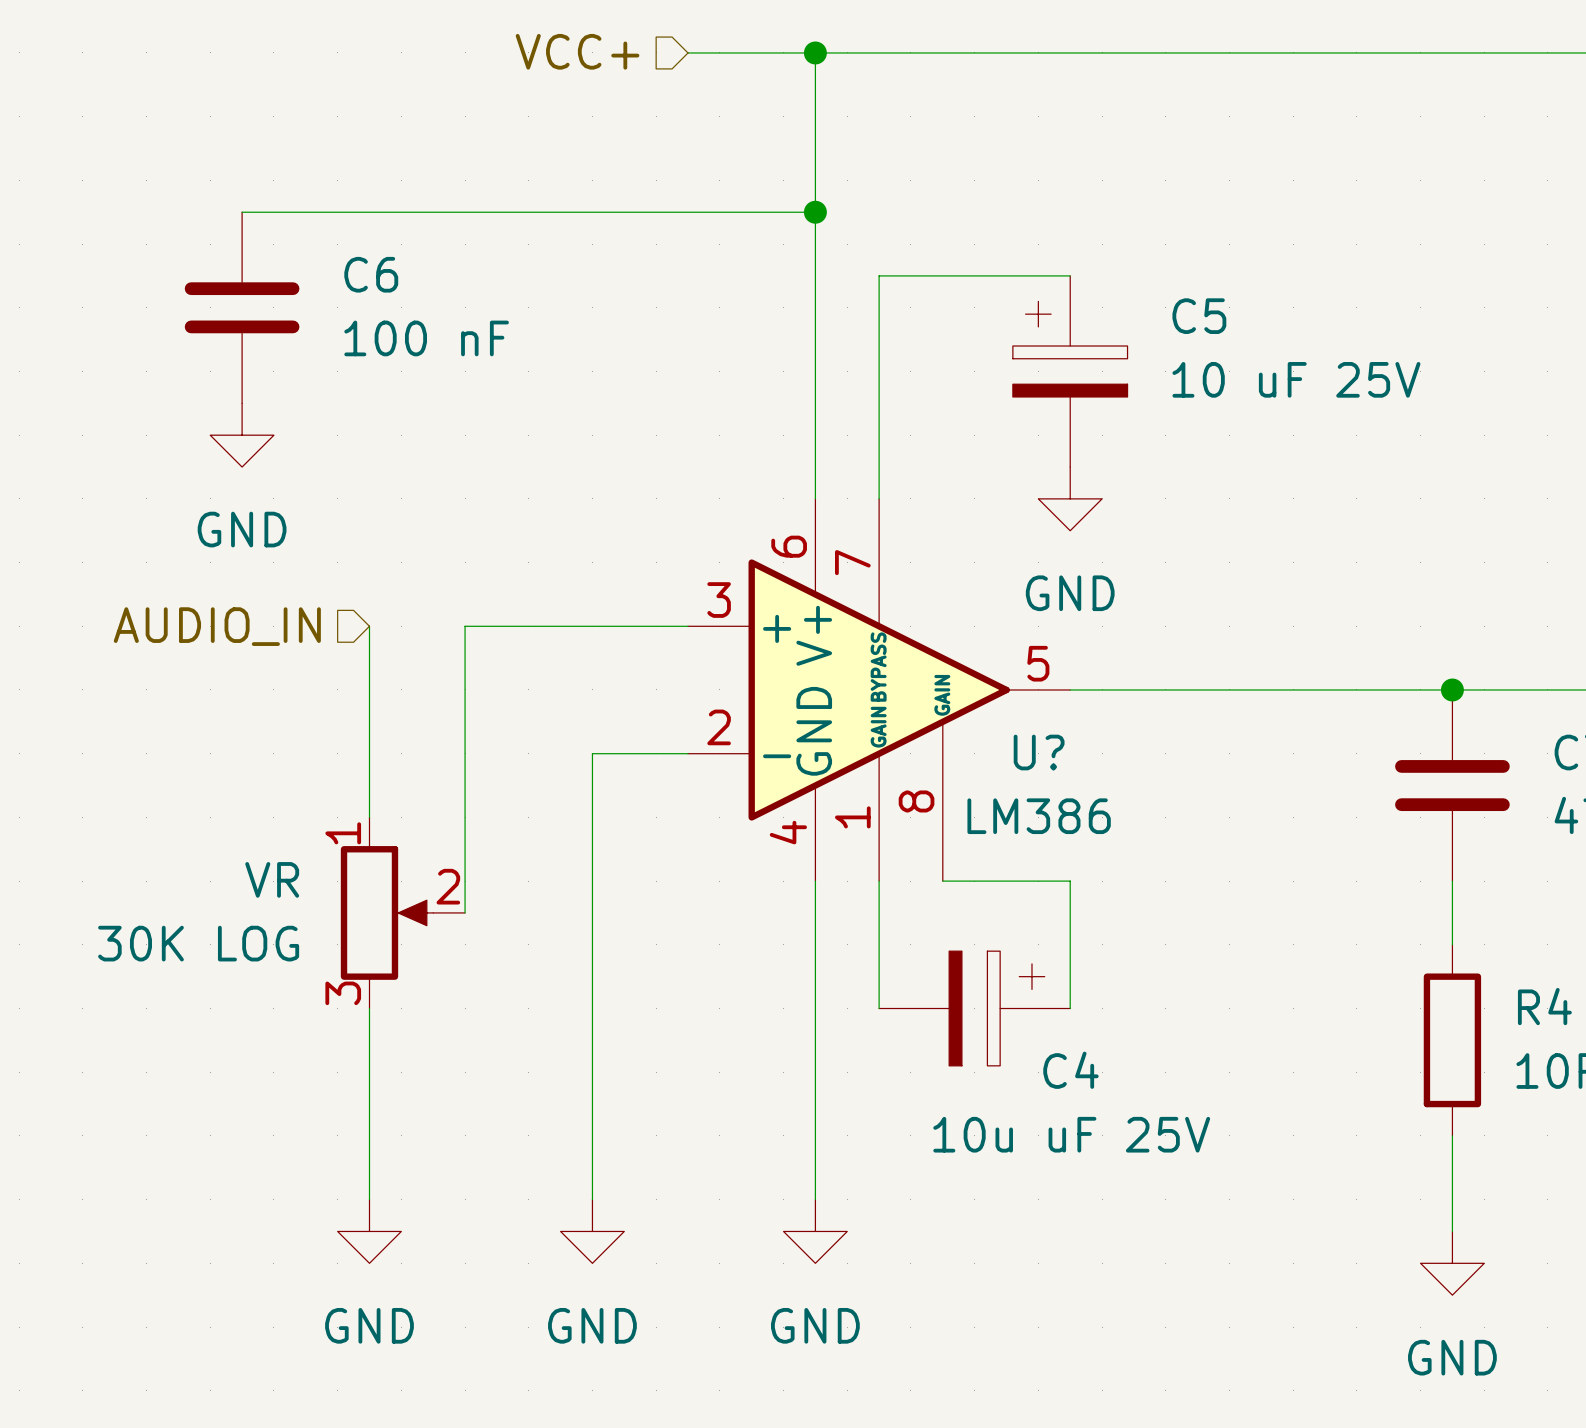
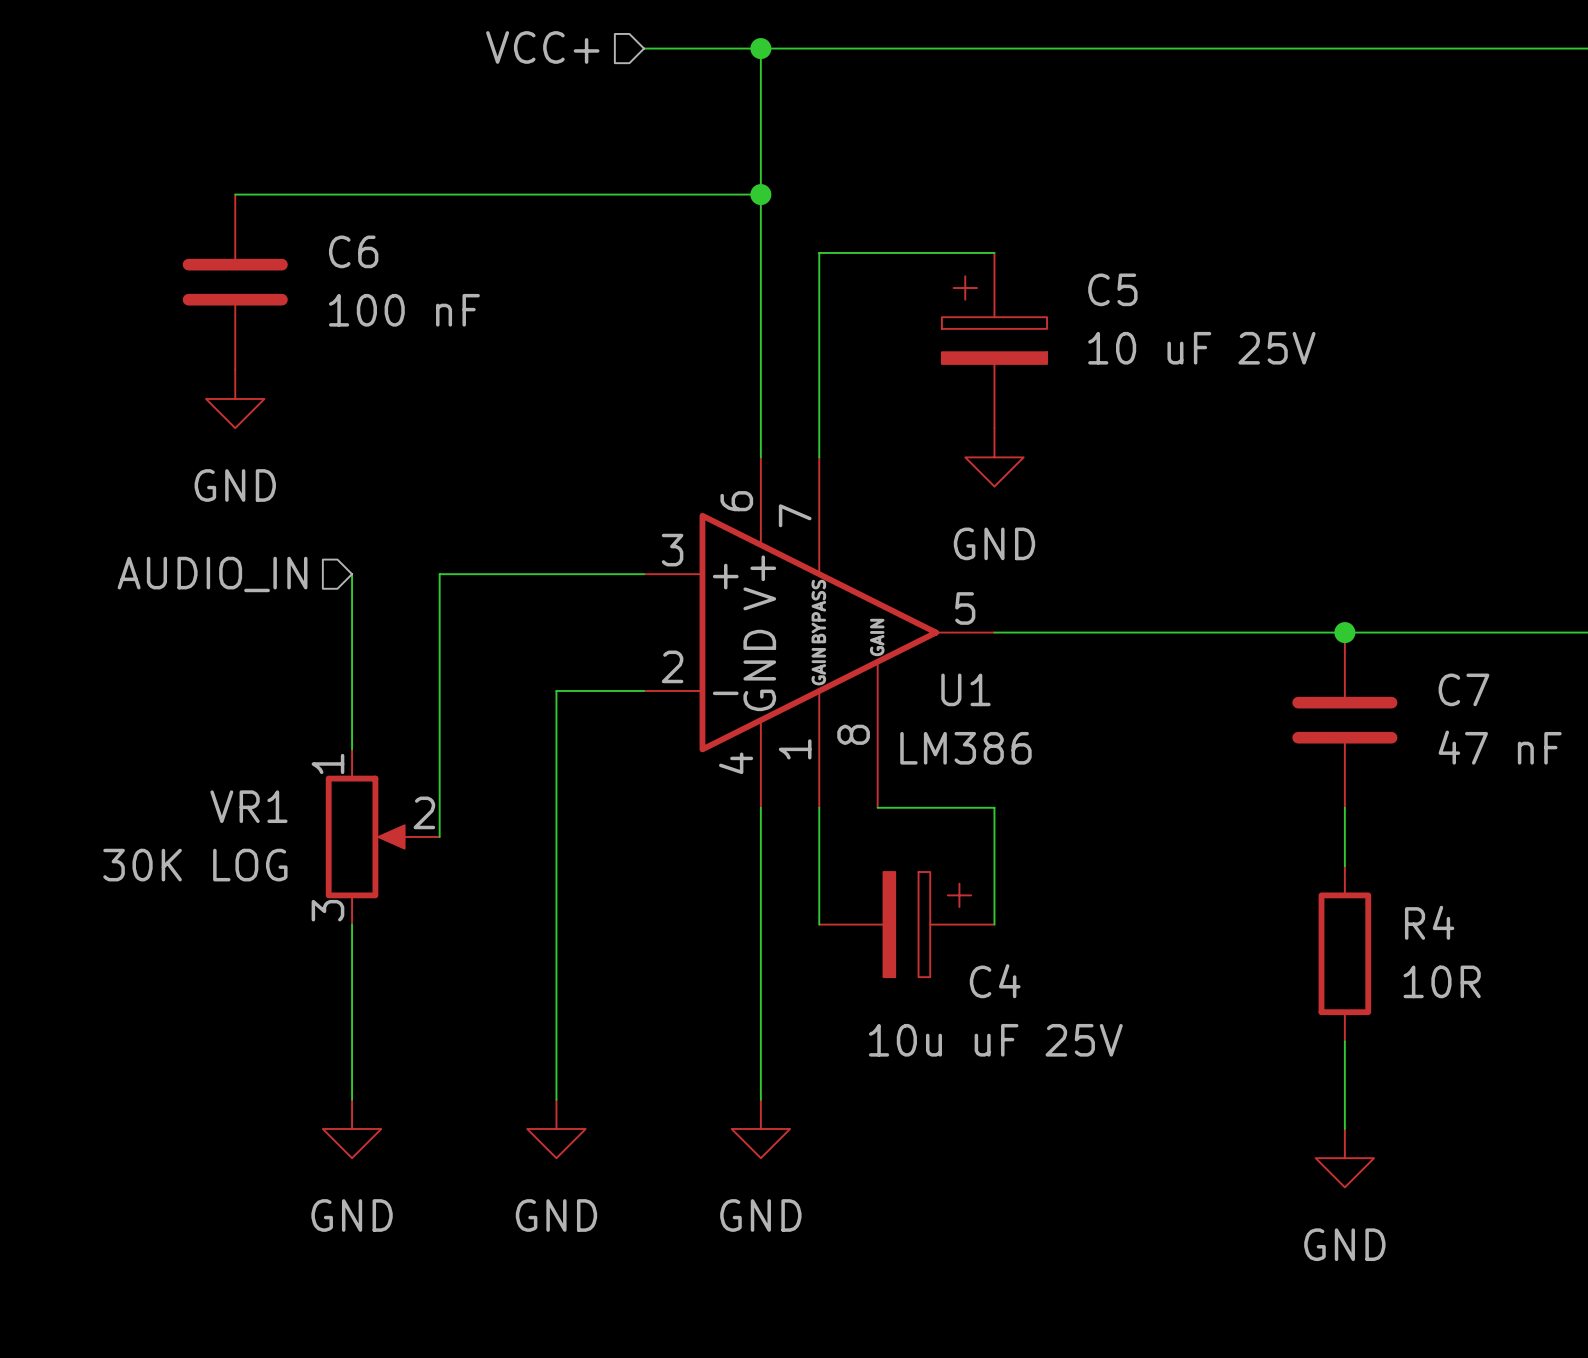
U? name: U? (1039, 752) -> U1 (965, 689)
VR name: VR (272, 879) -> VR1 (248, 806)

